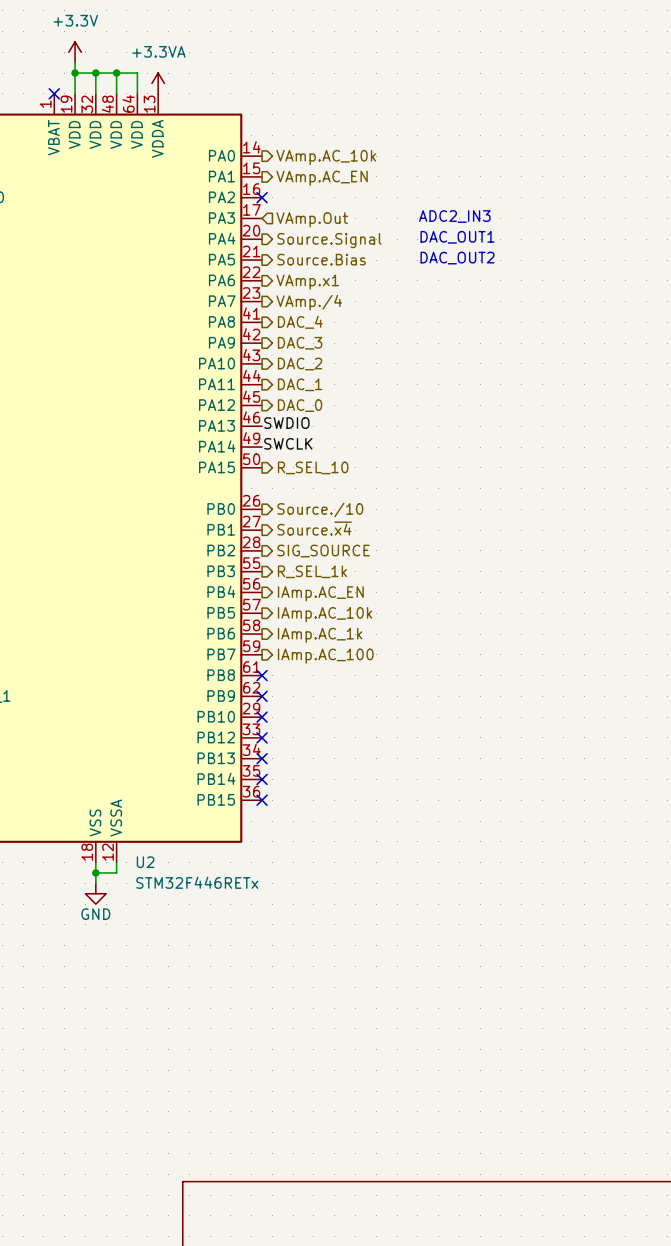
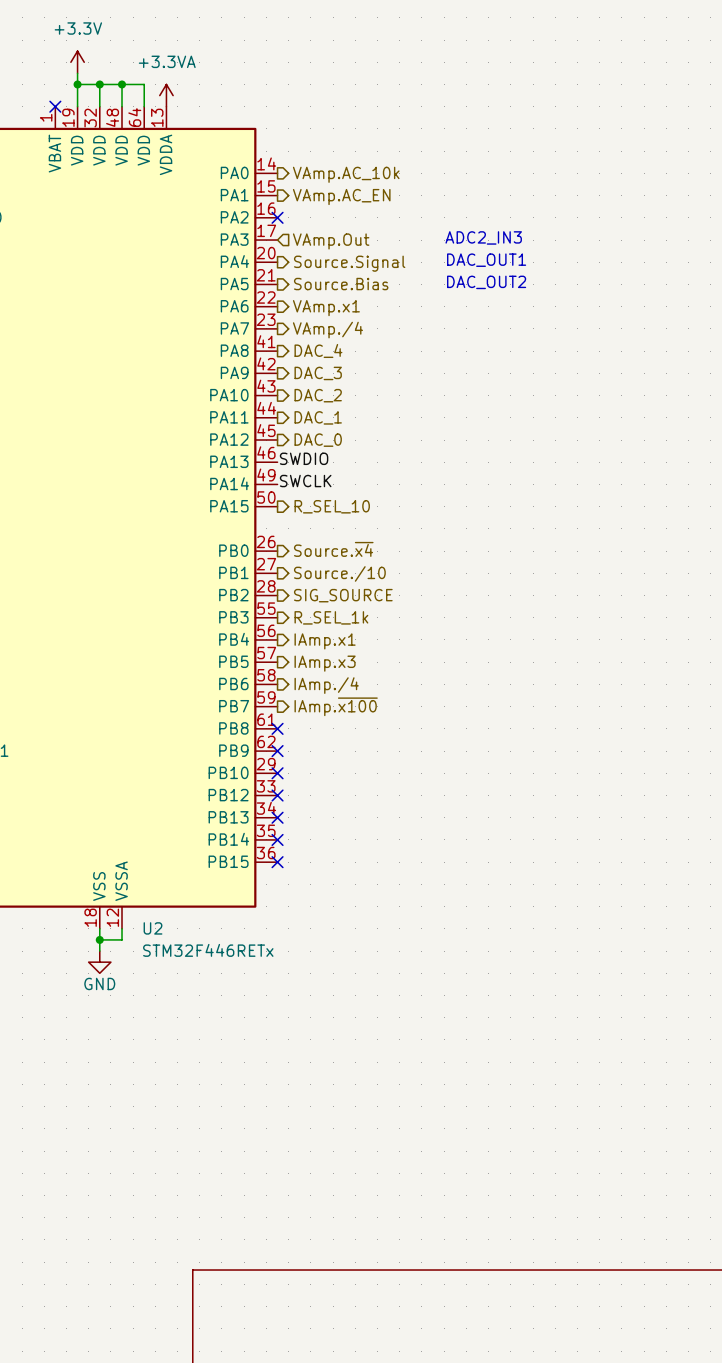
hierarchical label: Source./10 (320, 509) -> Source.~{x4} (333, 549)
hierarchical label: Source.~{x4} (314, 528) -> Source./10 (339, 573)
hierarchical label: IAmp.AC_EN (320, 593) -> IAmp.x1 (325, 641)
hierarchical label: IAmp.AC_10k (325, 614) -> IAmp.x3 (325, 663)
hierarchical label: IAmp.AC_1k (320, 635) -> IAmp./4 (326, 685)
hierarchical label: IAmp.AC_100 (325, 656) -> IAmp.~{x100} (336, 706)

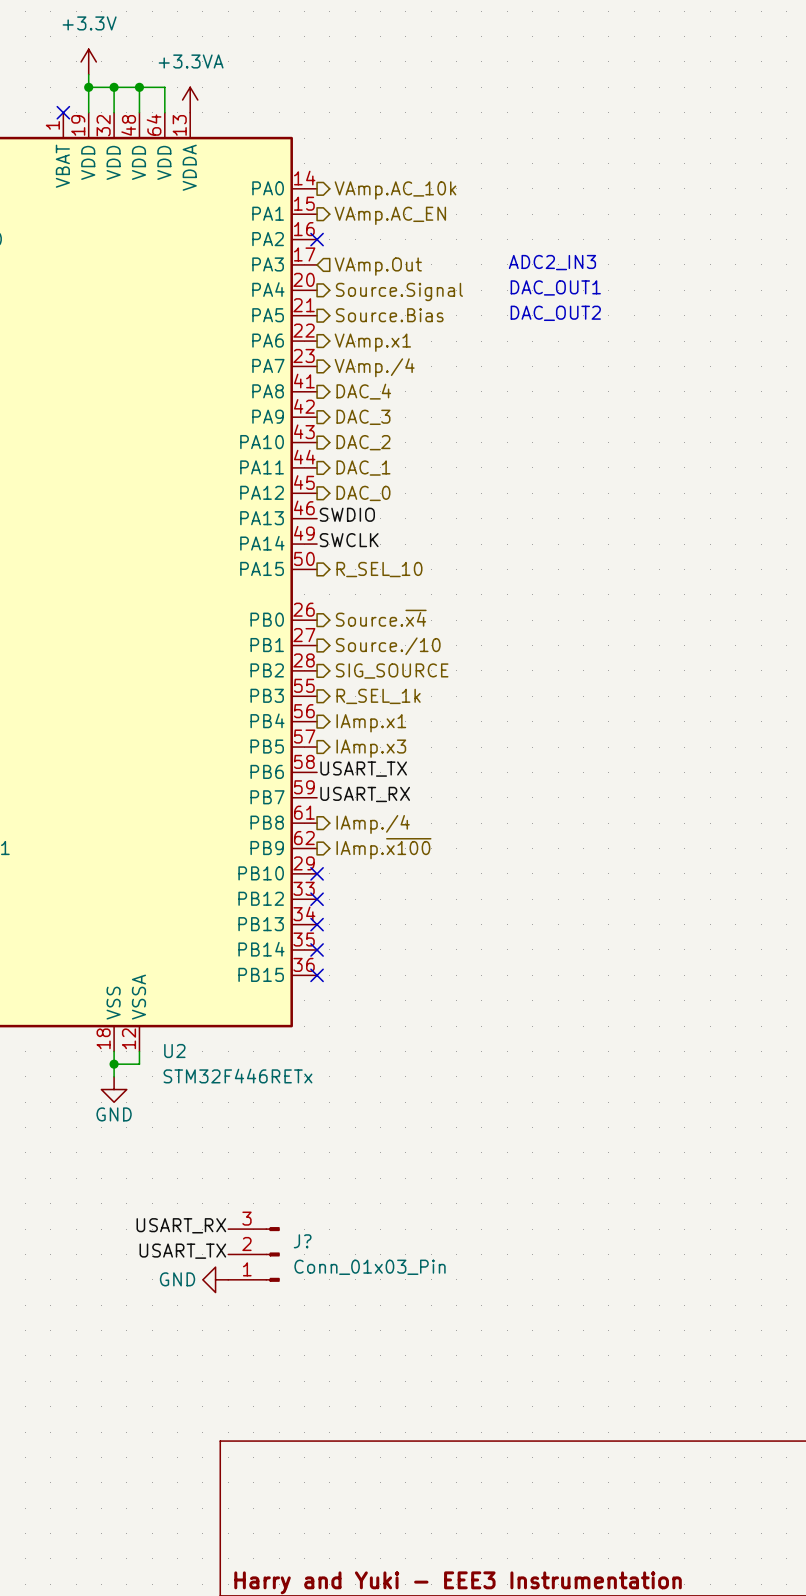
label: none -> USART_TX (363, 769)
hierarchical label position: IAmp./4 (326, 685) -> IAmp./4 (373, 824)
label: none -> USART_RX (365, 794)
hierarchical label position: IAmp.~{x100} (336, 706) -> IAmp.~{x100} (383, 848)
no-connect mark: (277, 728) -> none
no-connect mark: (277, 751) -> none
label: none -> USART_RX (181, 1225)
label: none -> USART_TX (182, 1251)
J?: none -> Conn_01x03_Pin (254, 1254)
power symbol: none -> GND (215, 1279)

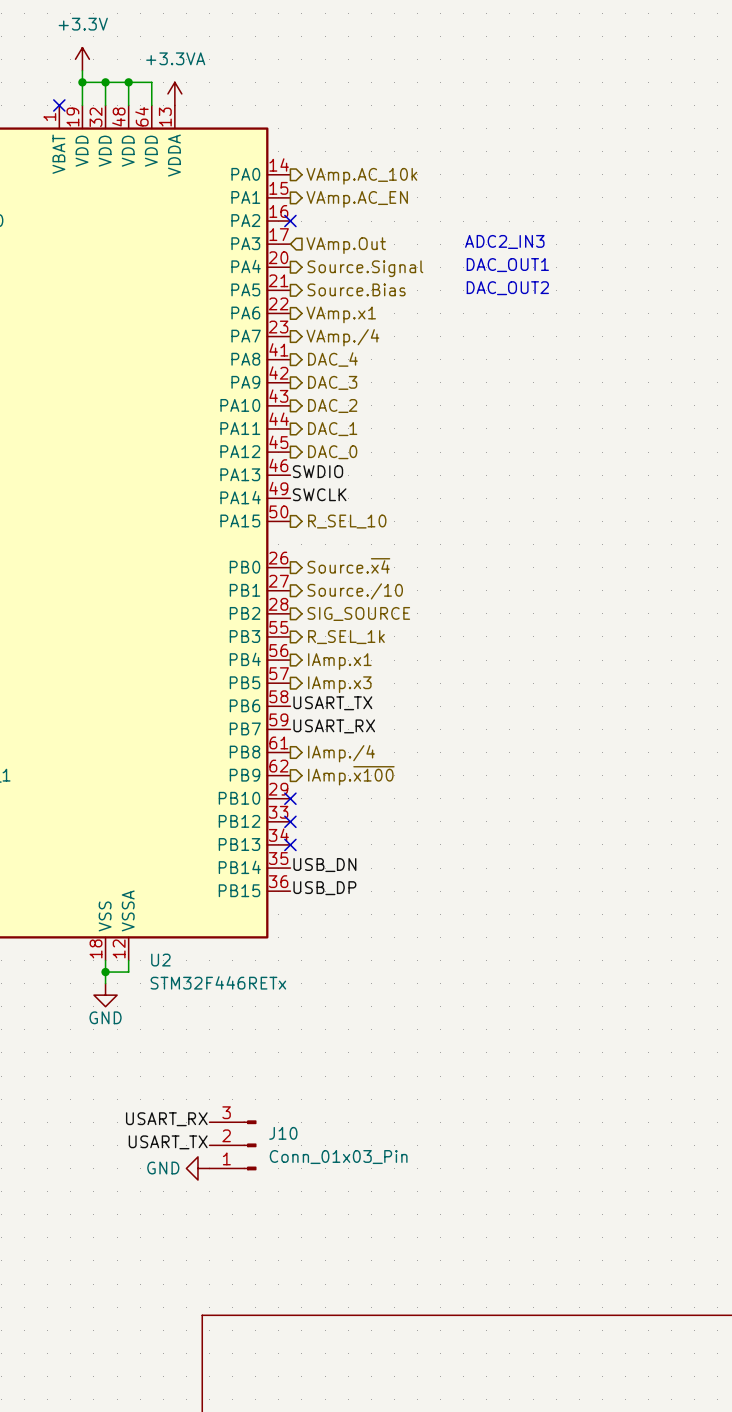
label: none -> USB_DN (324, 865)
no-connect mark: (317, 949) -> none
label: none -> USB_DP (324, 888)
no-connect mark: (317, 975) -> none
J? name: J? (302, 1241) -> J10 (283, 1133)

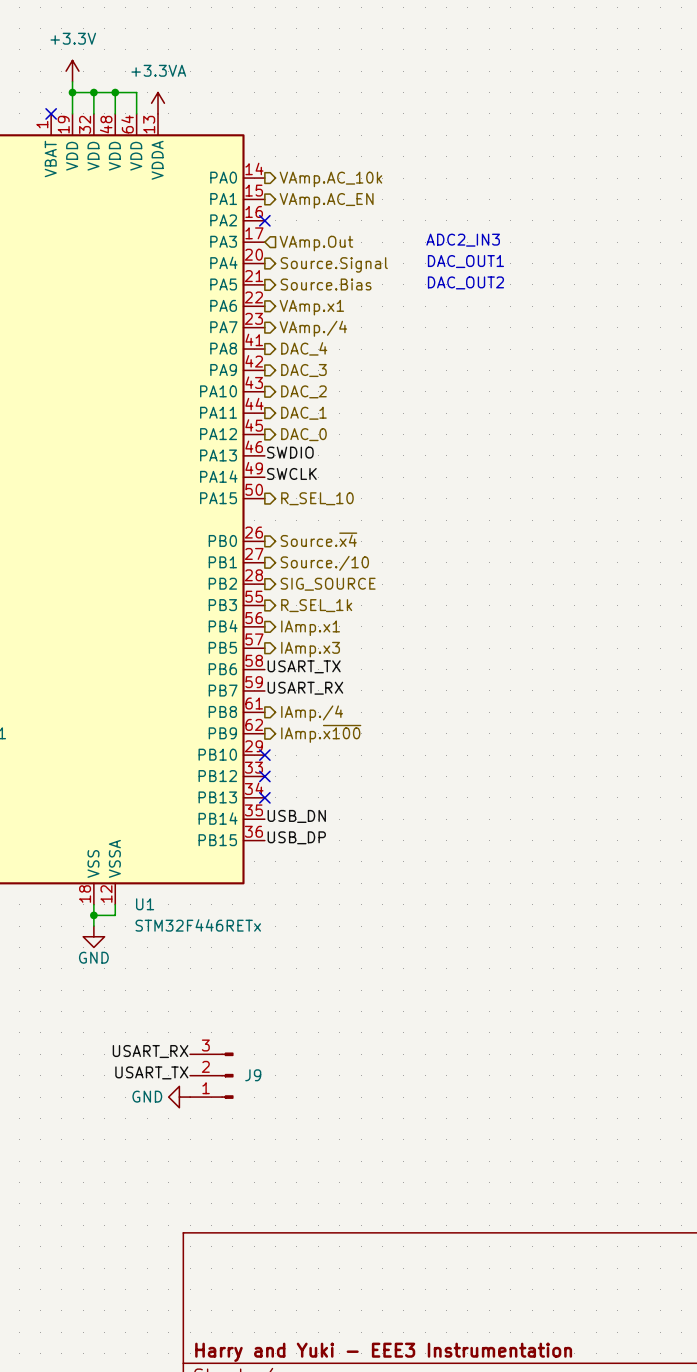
U2 name: U2 (160, 960) -> U1 (145, 904)
J10 name: J10 (283, 1133) -> J9 (253, 1075)
J10 value: Conn_01x03_Pin (338, 1157) -> none

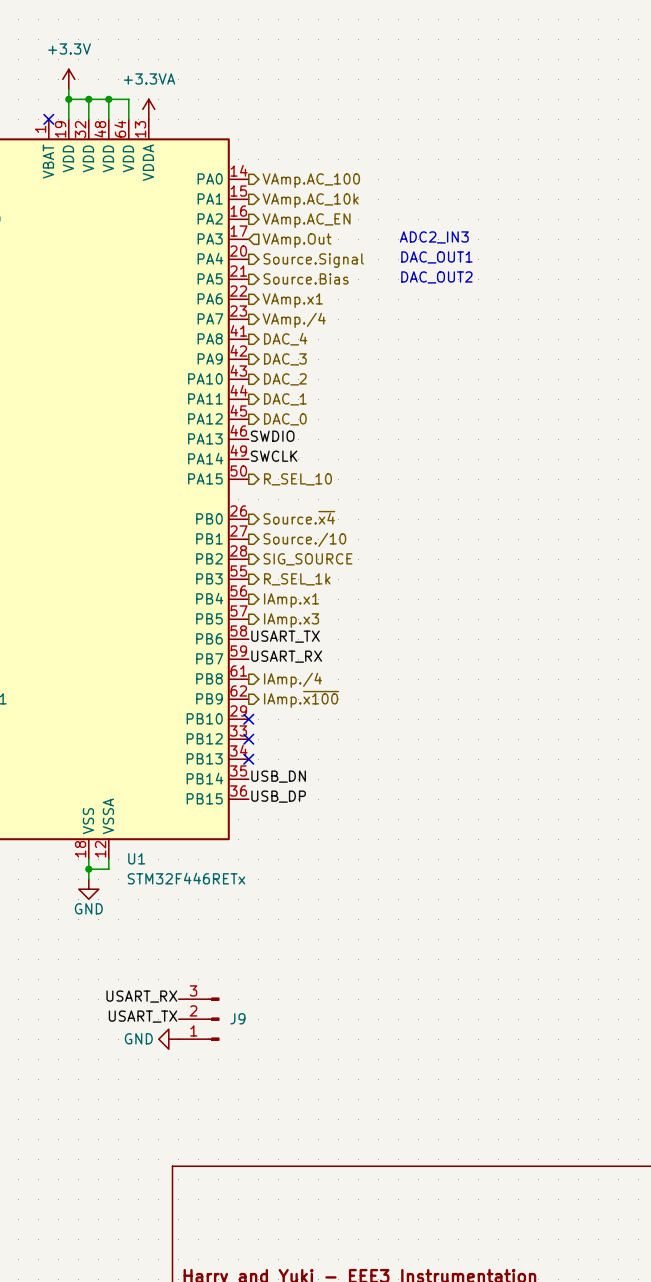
hierarchical label: VAmp.AC_10k (330, 179) -> VAmp.AC_100 (311, 180)
hierarchical label: VAmp.AC_EN (326, 200) -> VAmp.AC_10k (310, 200)
no-connect mark: (264, 220) -> none
hierarchical label: none -> VAmp.AC_EN (306, 220)

